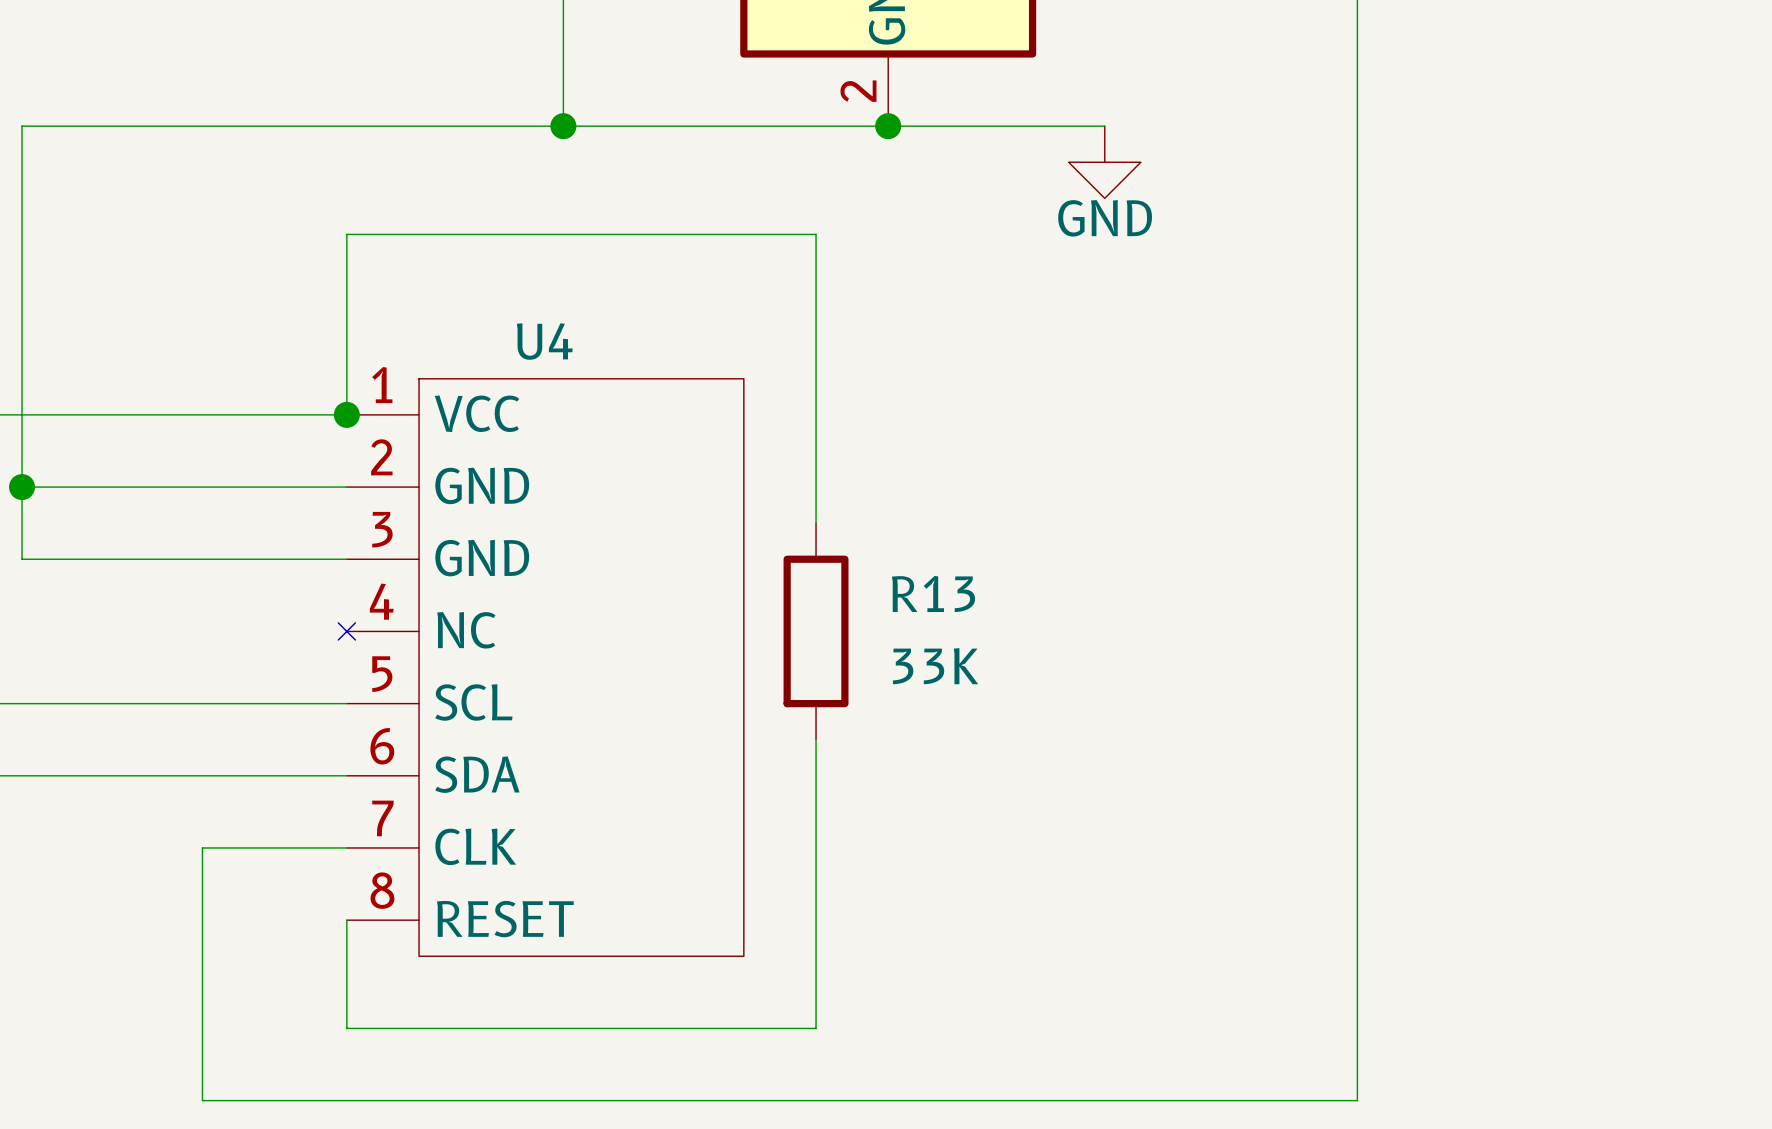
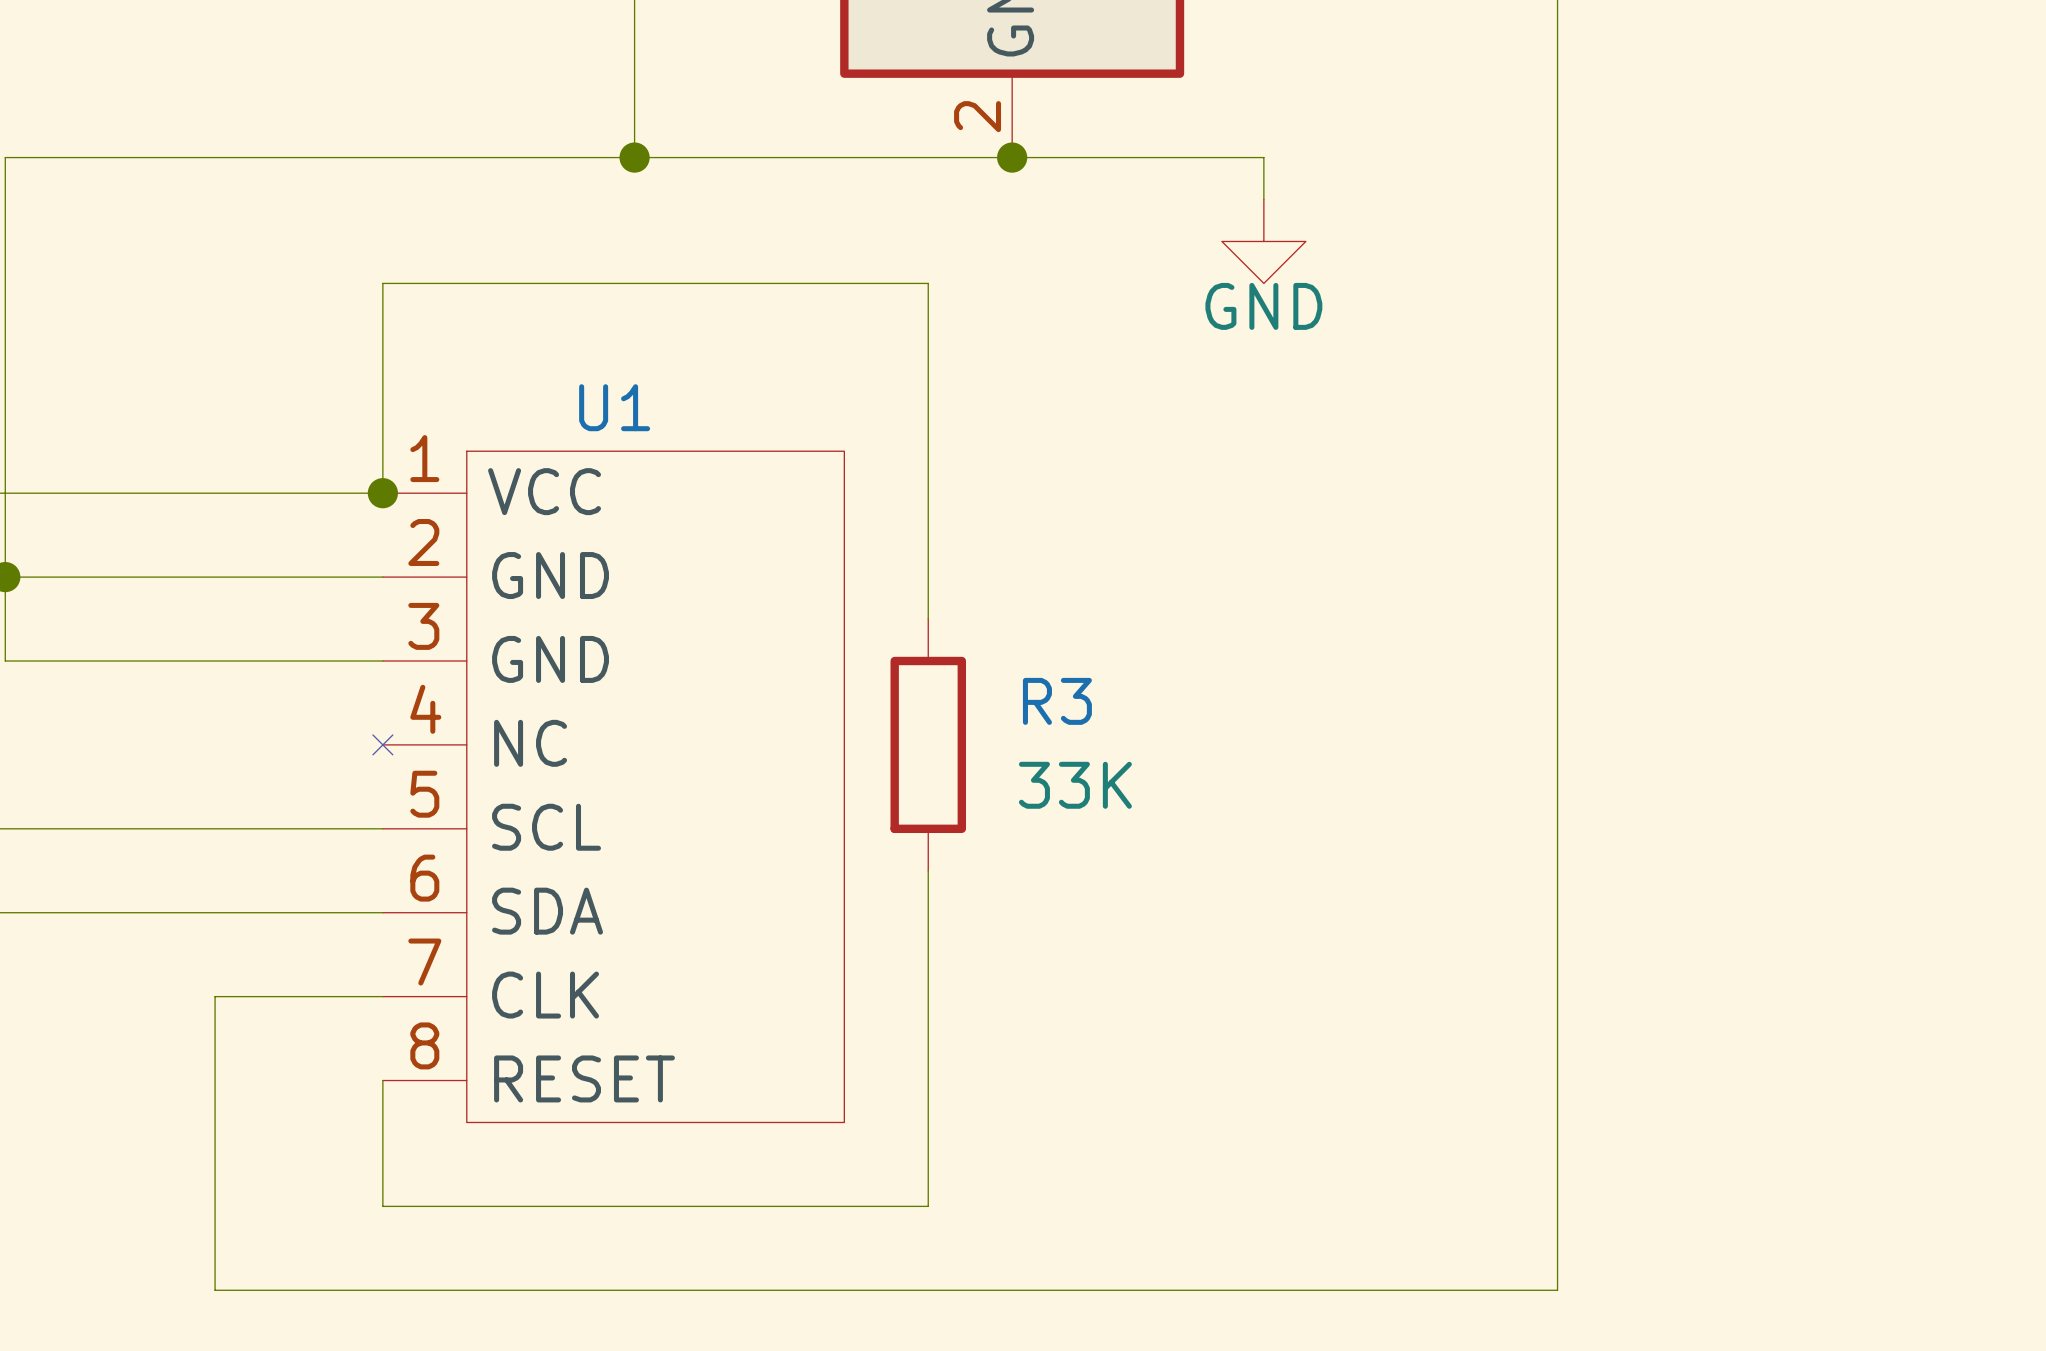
power symbol position: GND (1104, 162) -> GND (1263, 241)
U4 name: U4 (544, 341) -> U1 (614, 407)
R13 name: R13 (933, 593) -> R3 (1057, 701)

